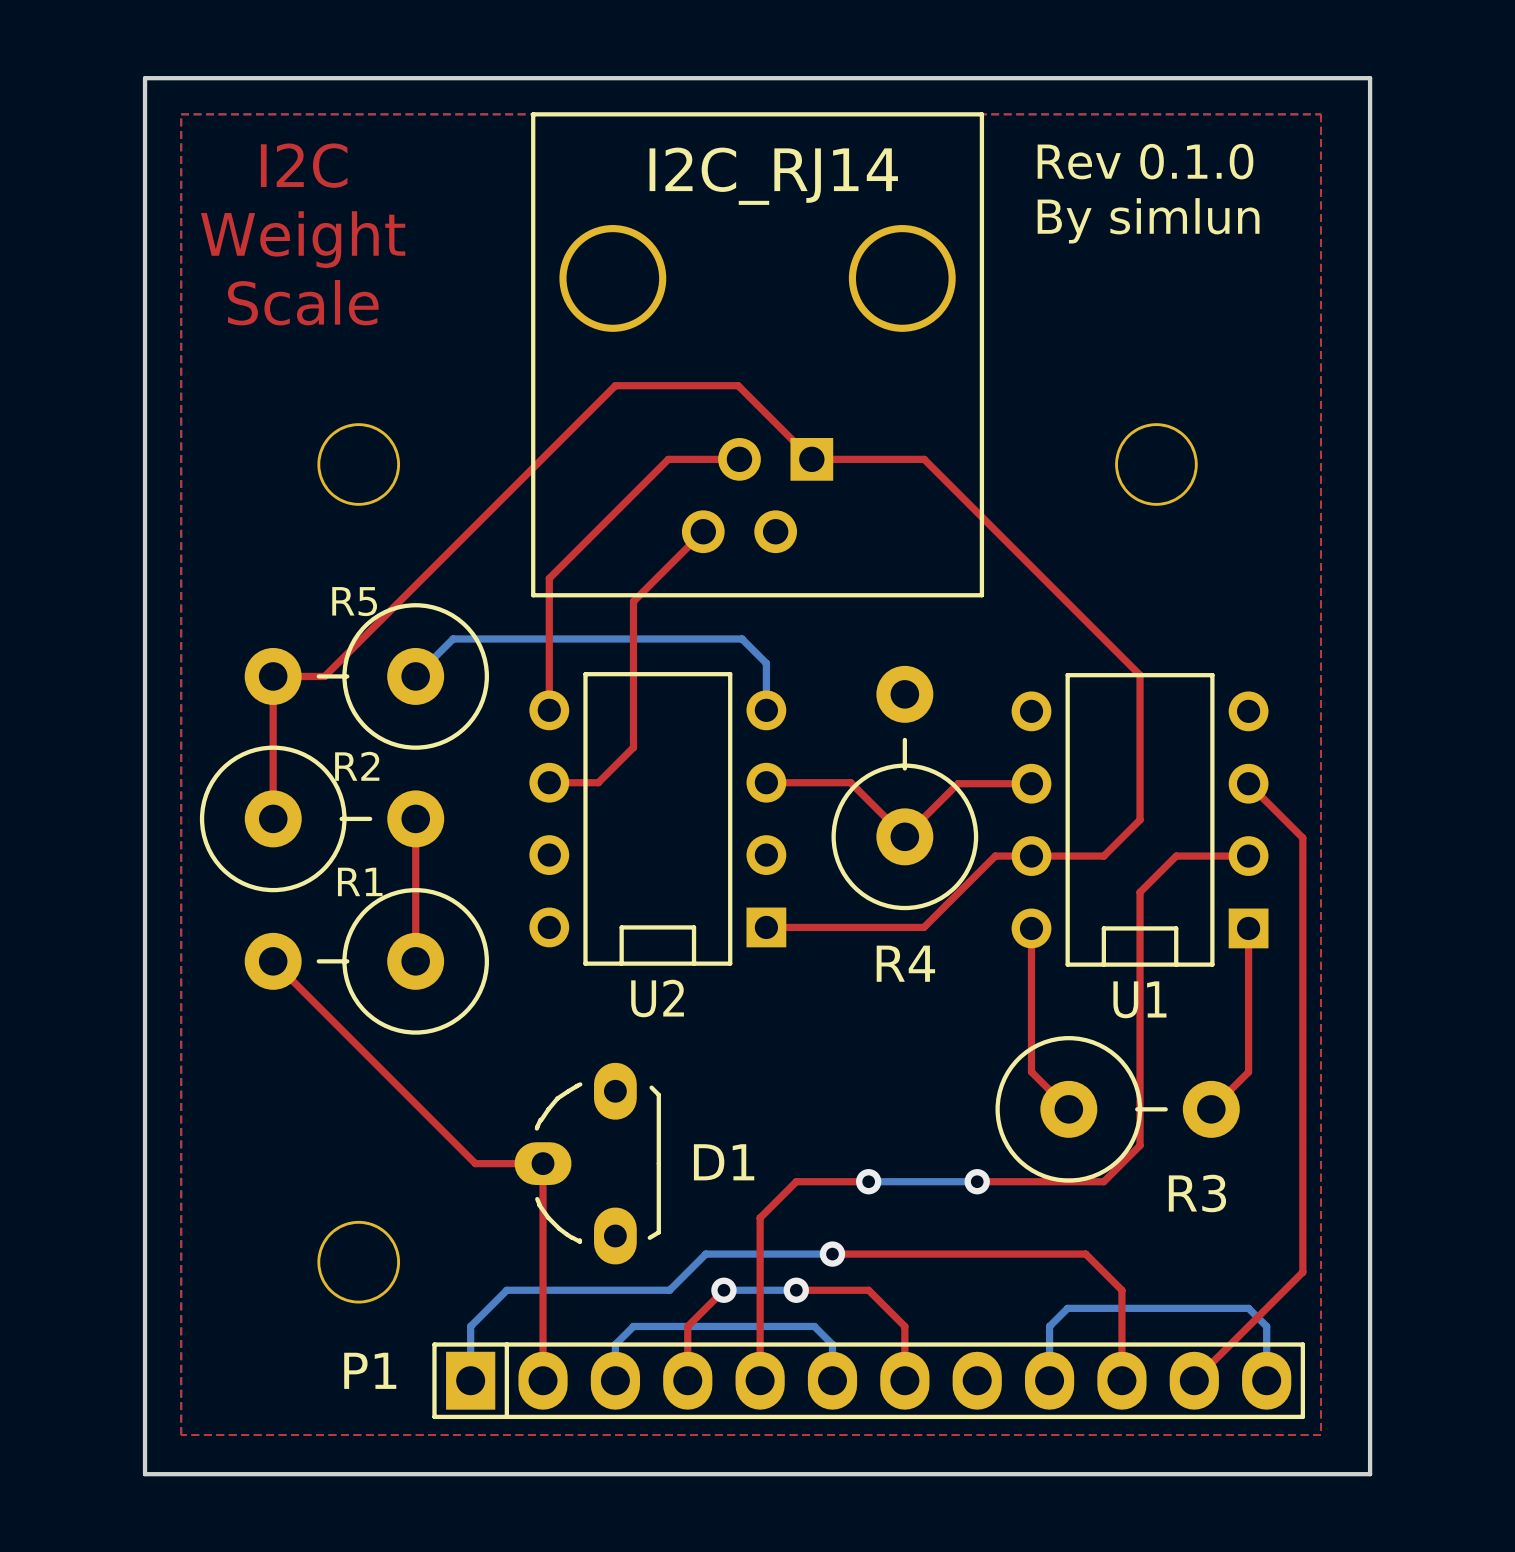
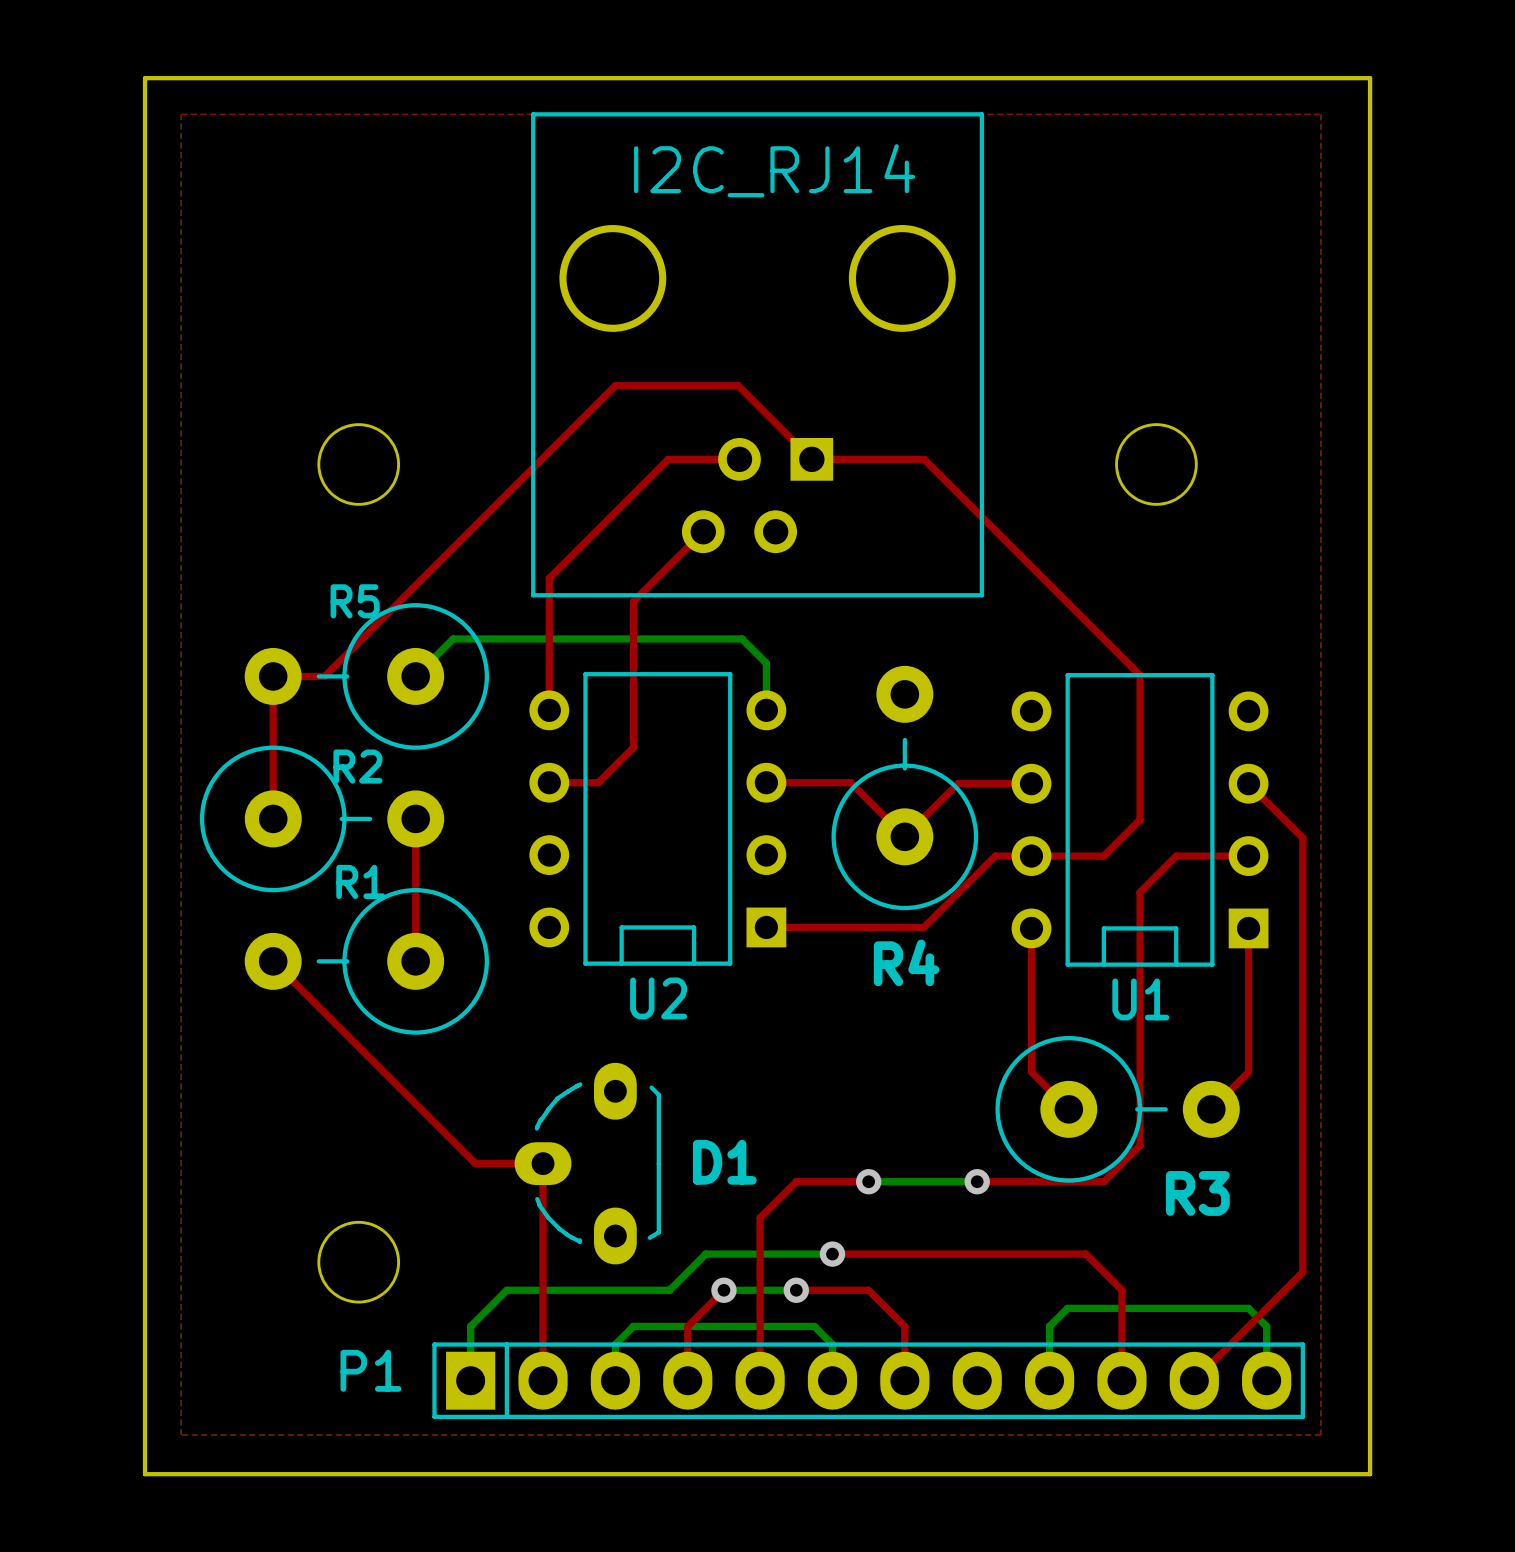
text: Rev 0.1.0 (1145, 161) -> none
text: I2C (304, 165) -> none
text: By simlun (1148, 220) -> none
text: Weight (303, 239) -> none
text: Scale (303, 302) -> none

